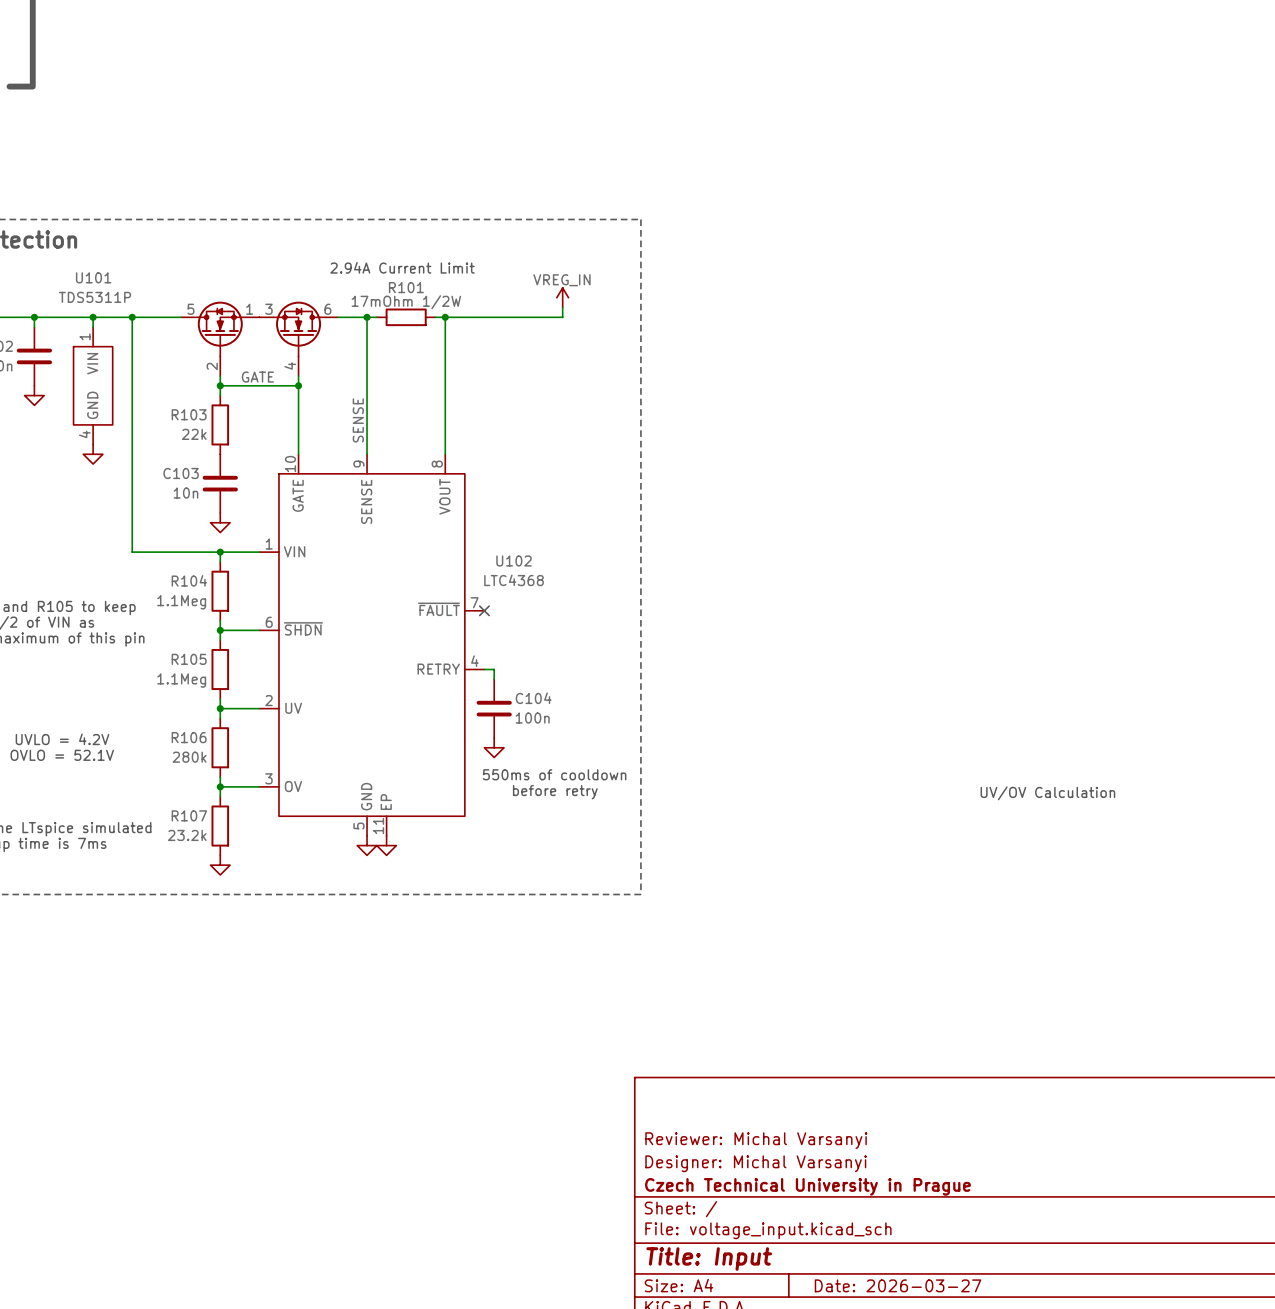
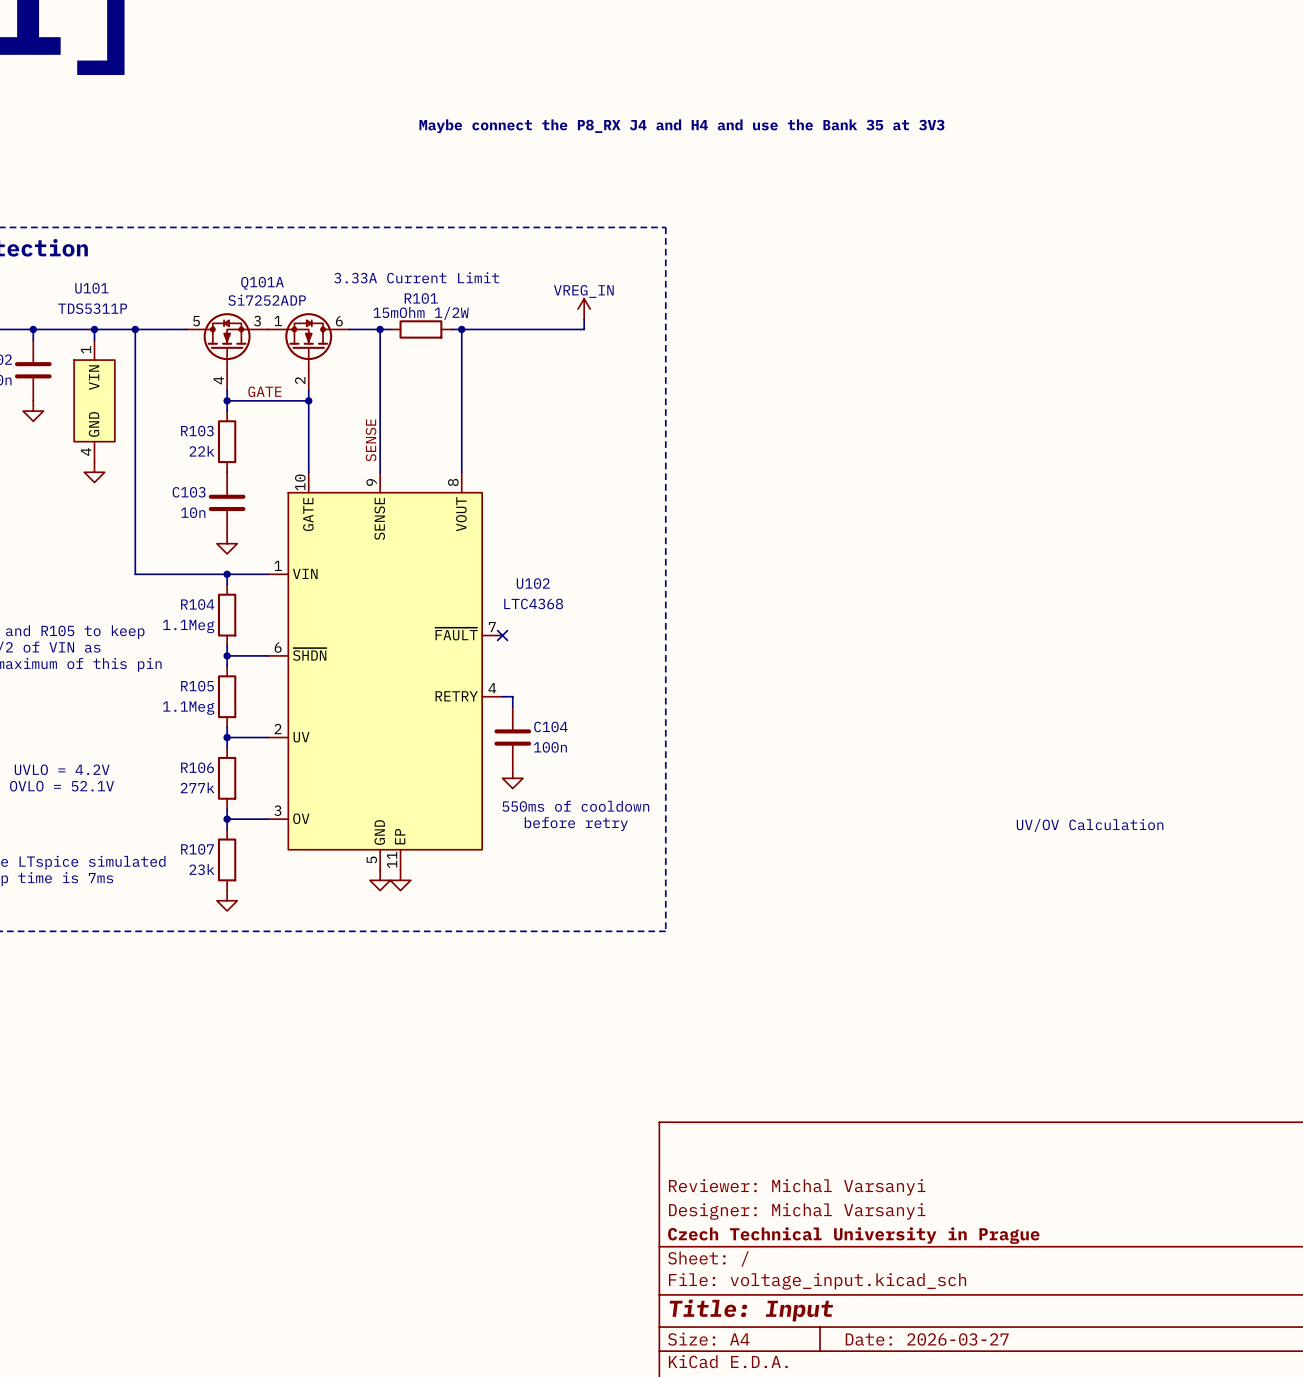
text: none -> Maybe connect the P8_RX J4 and H4 and use the Bank 35 at 3V3 (681, 126)
text: 2.94A Current Limit (402, 267) -> 3.33A Current Limit (416, 277)
Q101A name: none -> Q101A (262, 283)
Q101A value: none -> Si7252ADP (267, 300)
R101 value: 17mOhm 1/2W (406, 302) -> 15mOhm 1/2W (421, 313)
part pin number: 1 (249, 309) -> 3 (257, 321)
Q101A pin number: 3 (268, 309) -> 1 (278, 321)
part pin number: 2 (212, 366) -> 4 (218, 380)
Q101A pin number: 4 (290, 366) -> 2 (300, 380)
R106 value: 280k (189, 757) -> 277k (197, 787)
R107 value: 23.2k (187, 835) -> 23k (202, 869)

